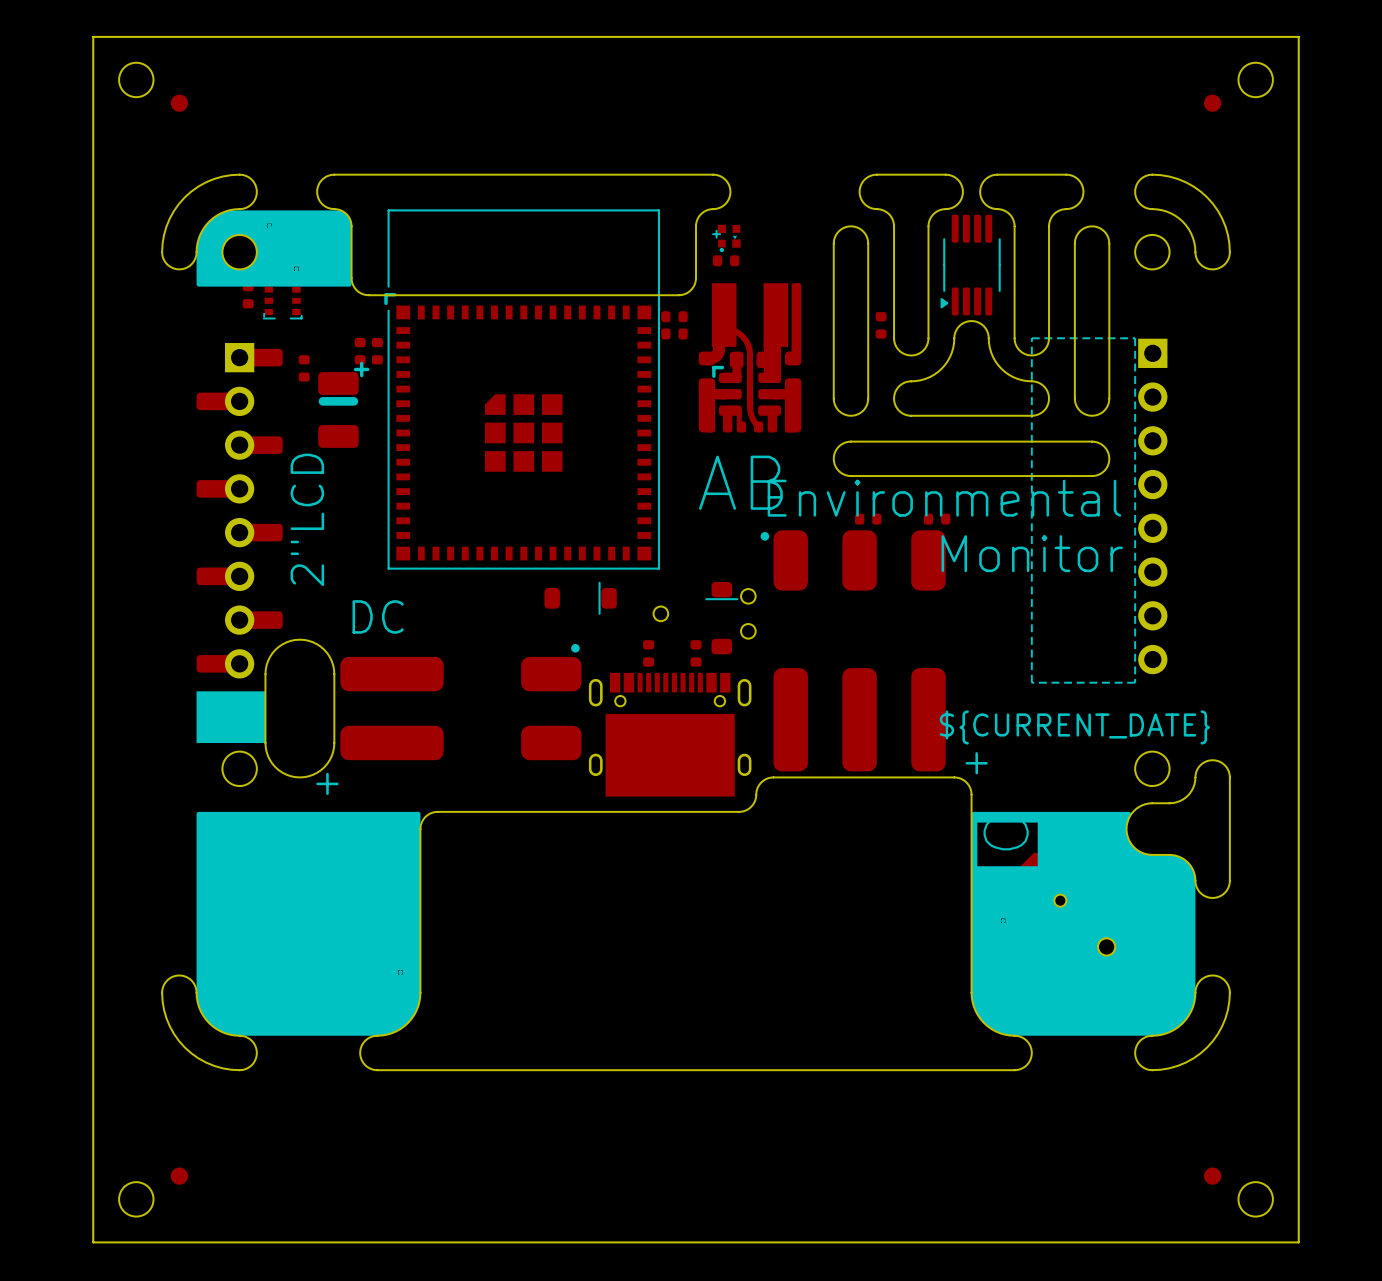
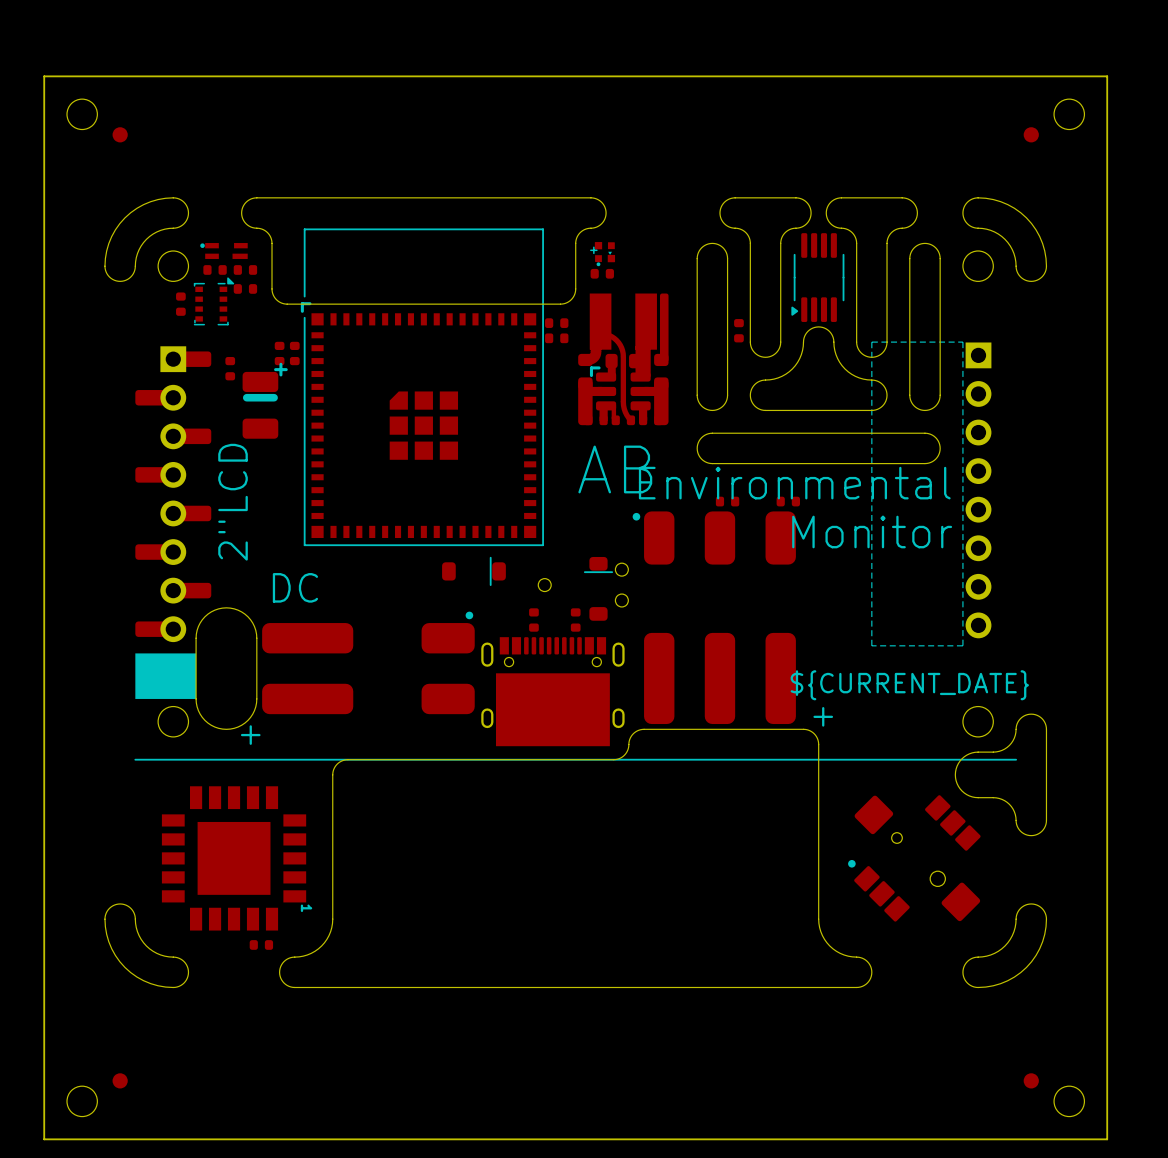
drawing: [196, 210, 352, 287] -> none
text: . (269, 225) -> none
text: . (296, 269) -> none
line: none -> (135, 759) (1016, 759)
drawing: [196, 811, 421, 1036] -> none
drawing: [971, 811, 1196, 1036] -> none
text: C (1006, 835) -> none
text: . (1003, 920) -> none
text: . (400, 972) -> none

